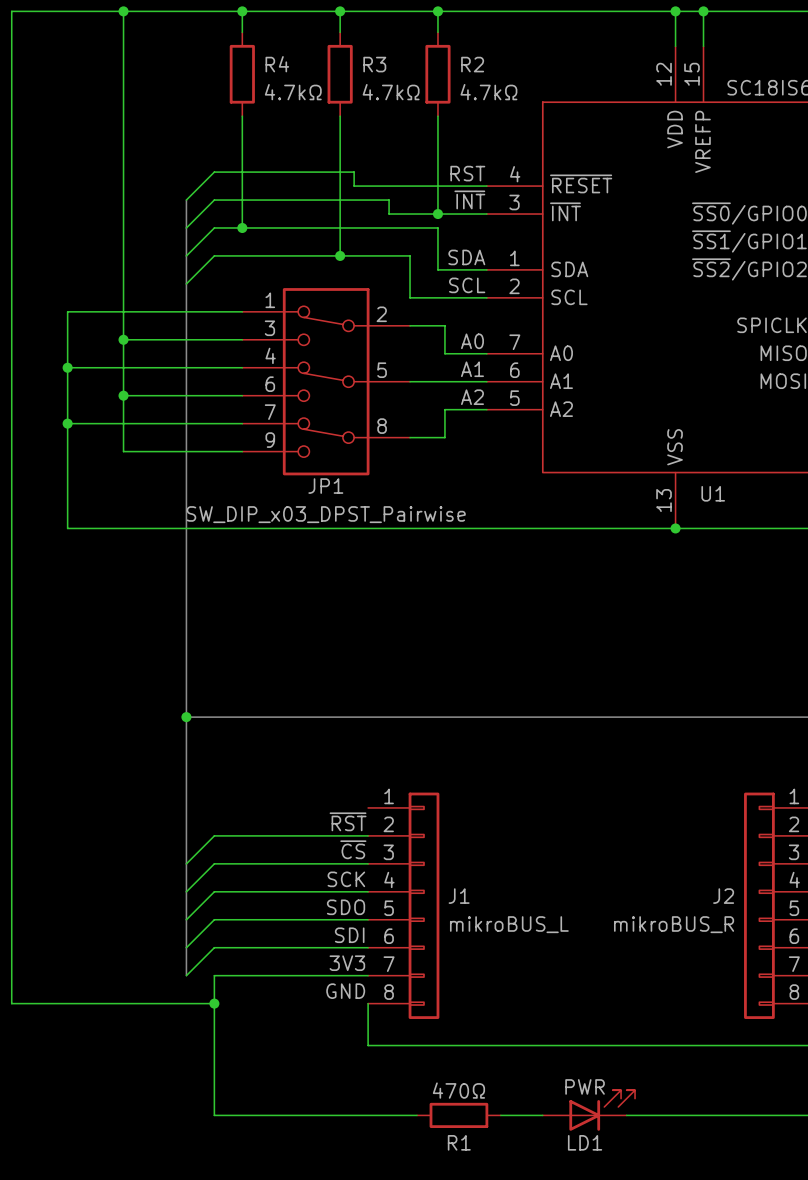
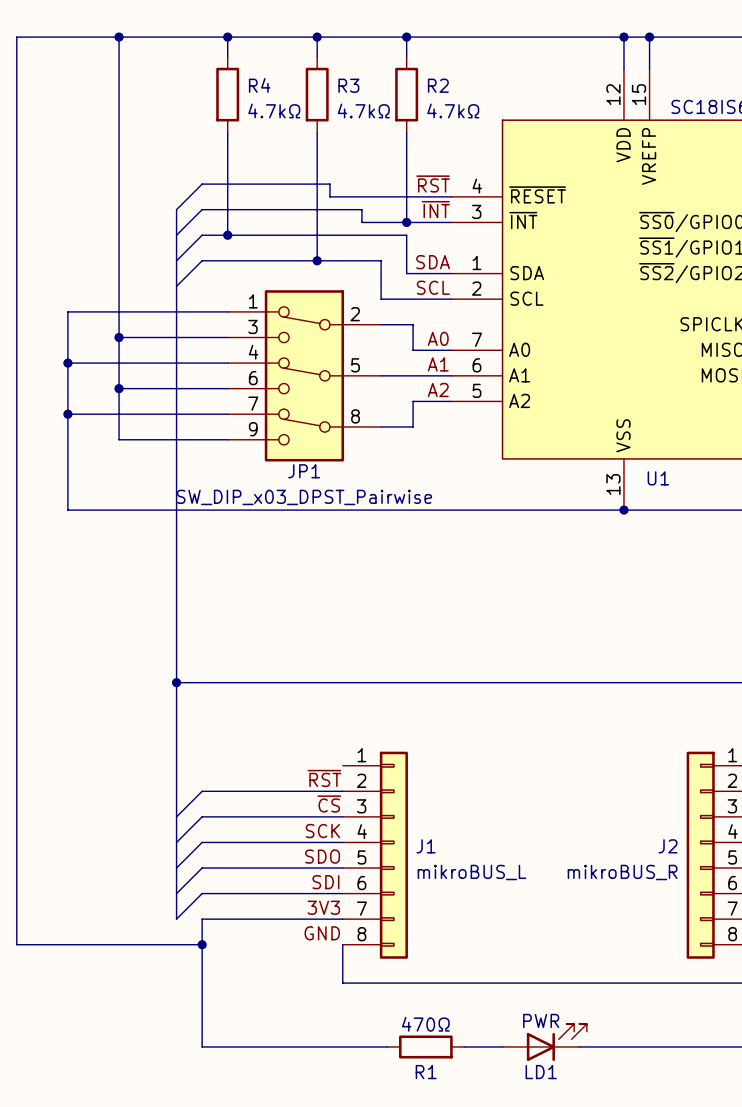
label: RST (467, 173) -> ~{RST} (433, 184)

